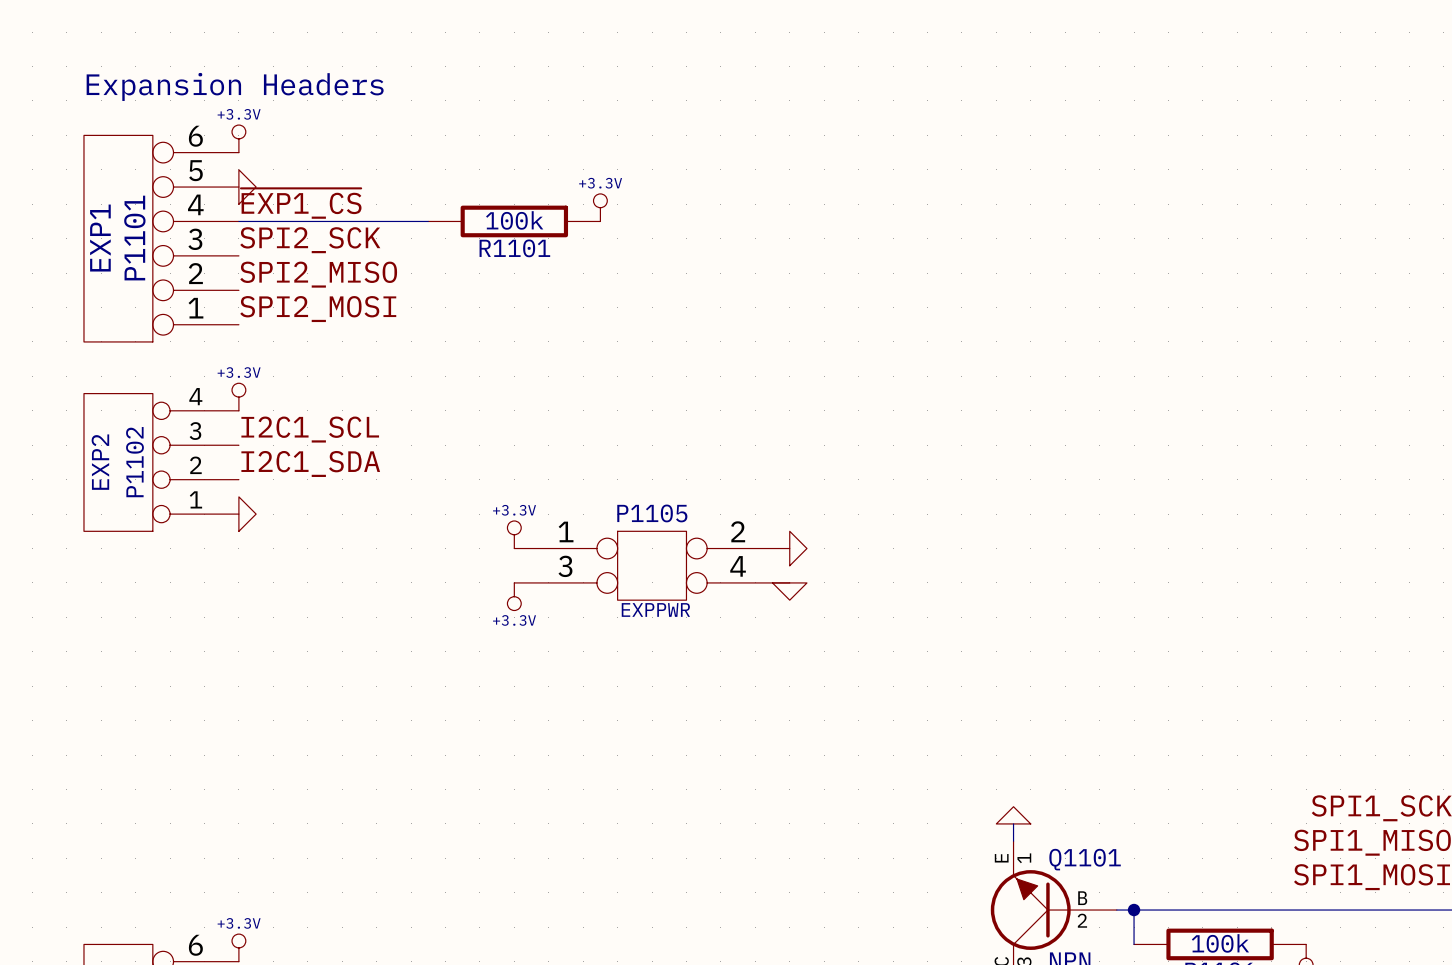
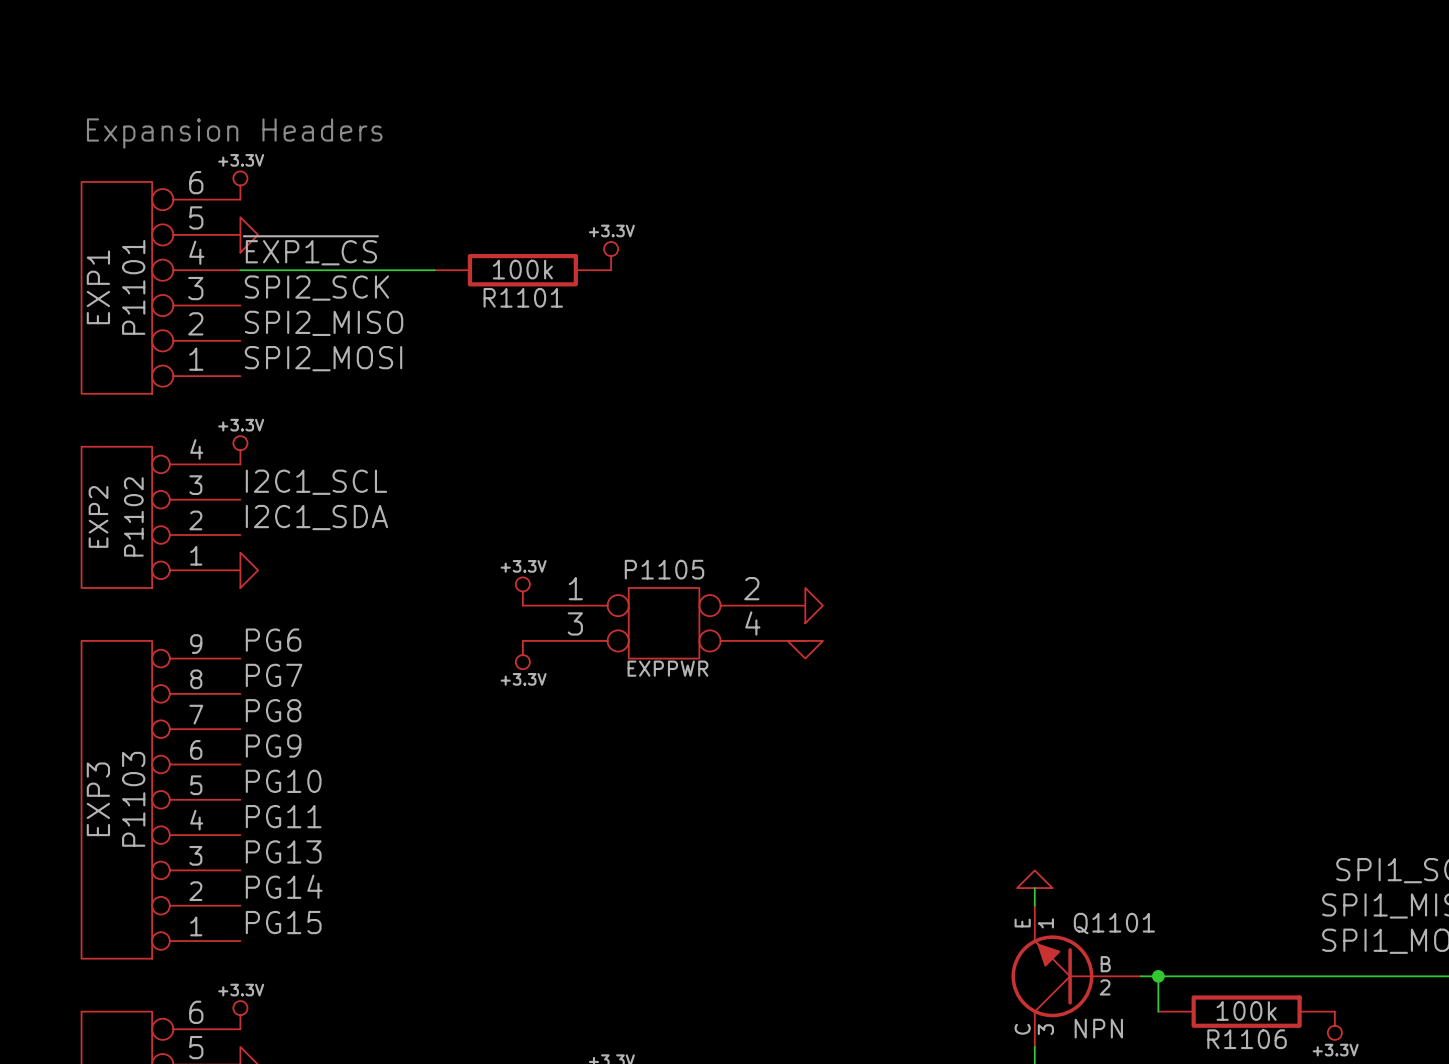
label: none -> PG6 (273, 640)
label: none -> PG7 (274, 675)
label: none -> PG8 (273, 710)
label: none -> PG9 (273, 746)
label: none -> PG10 (283, 781)
P1103: none -> EXP3 (160, 799)
label: none -> PG11 (283, 816)
label: none -> PG13 (283, 851)
label: none -> PG14 (284, 886)
label: none -> PG15 (283, 922)

